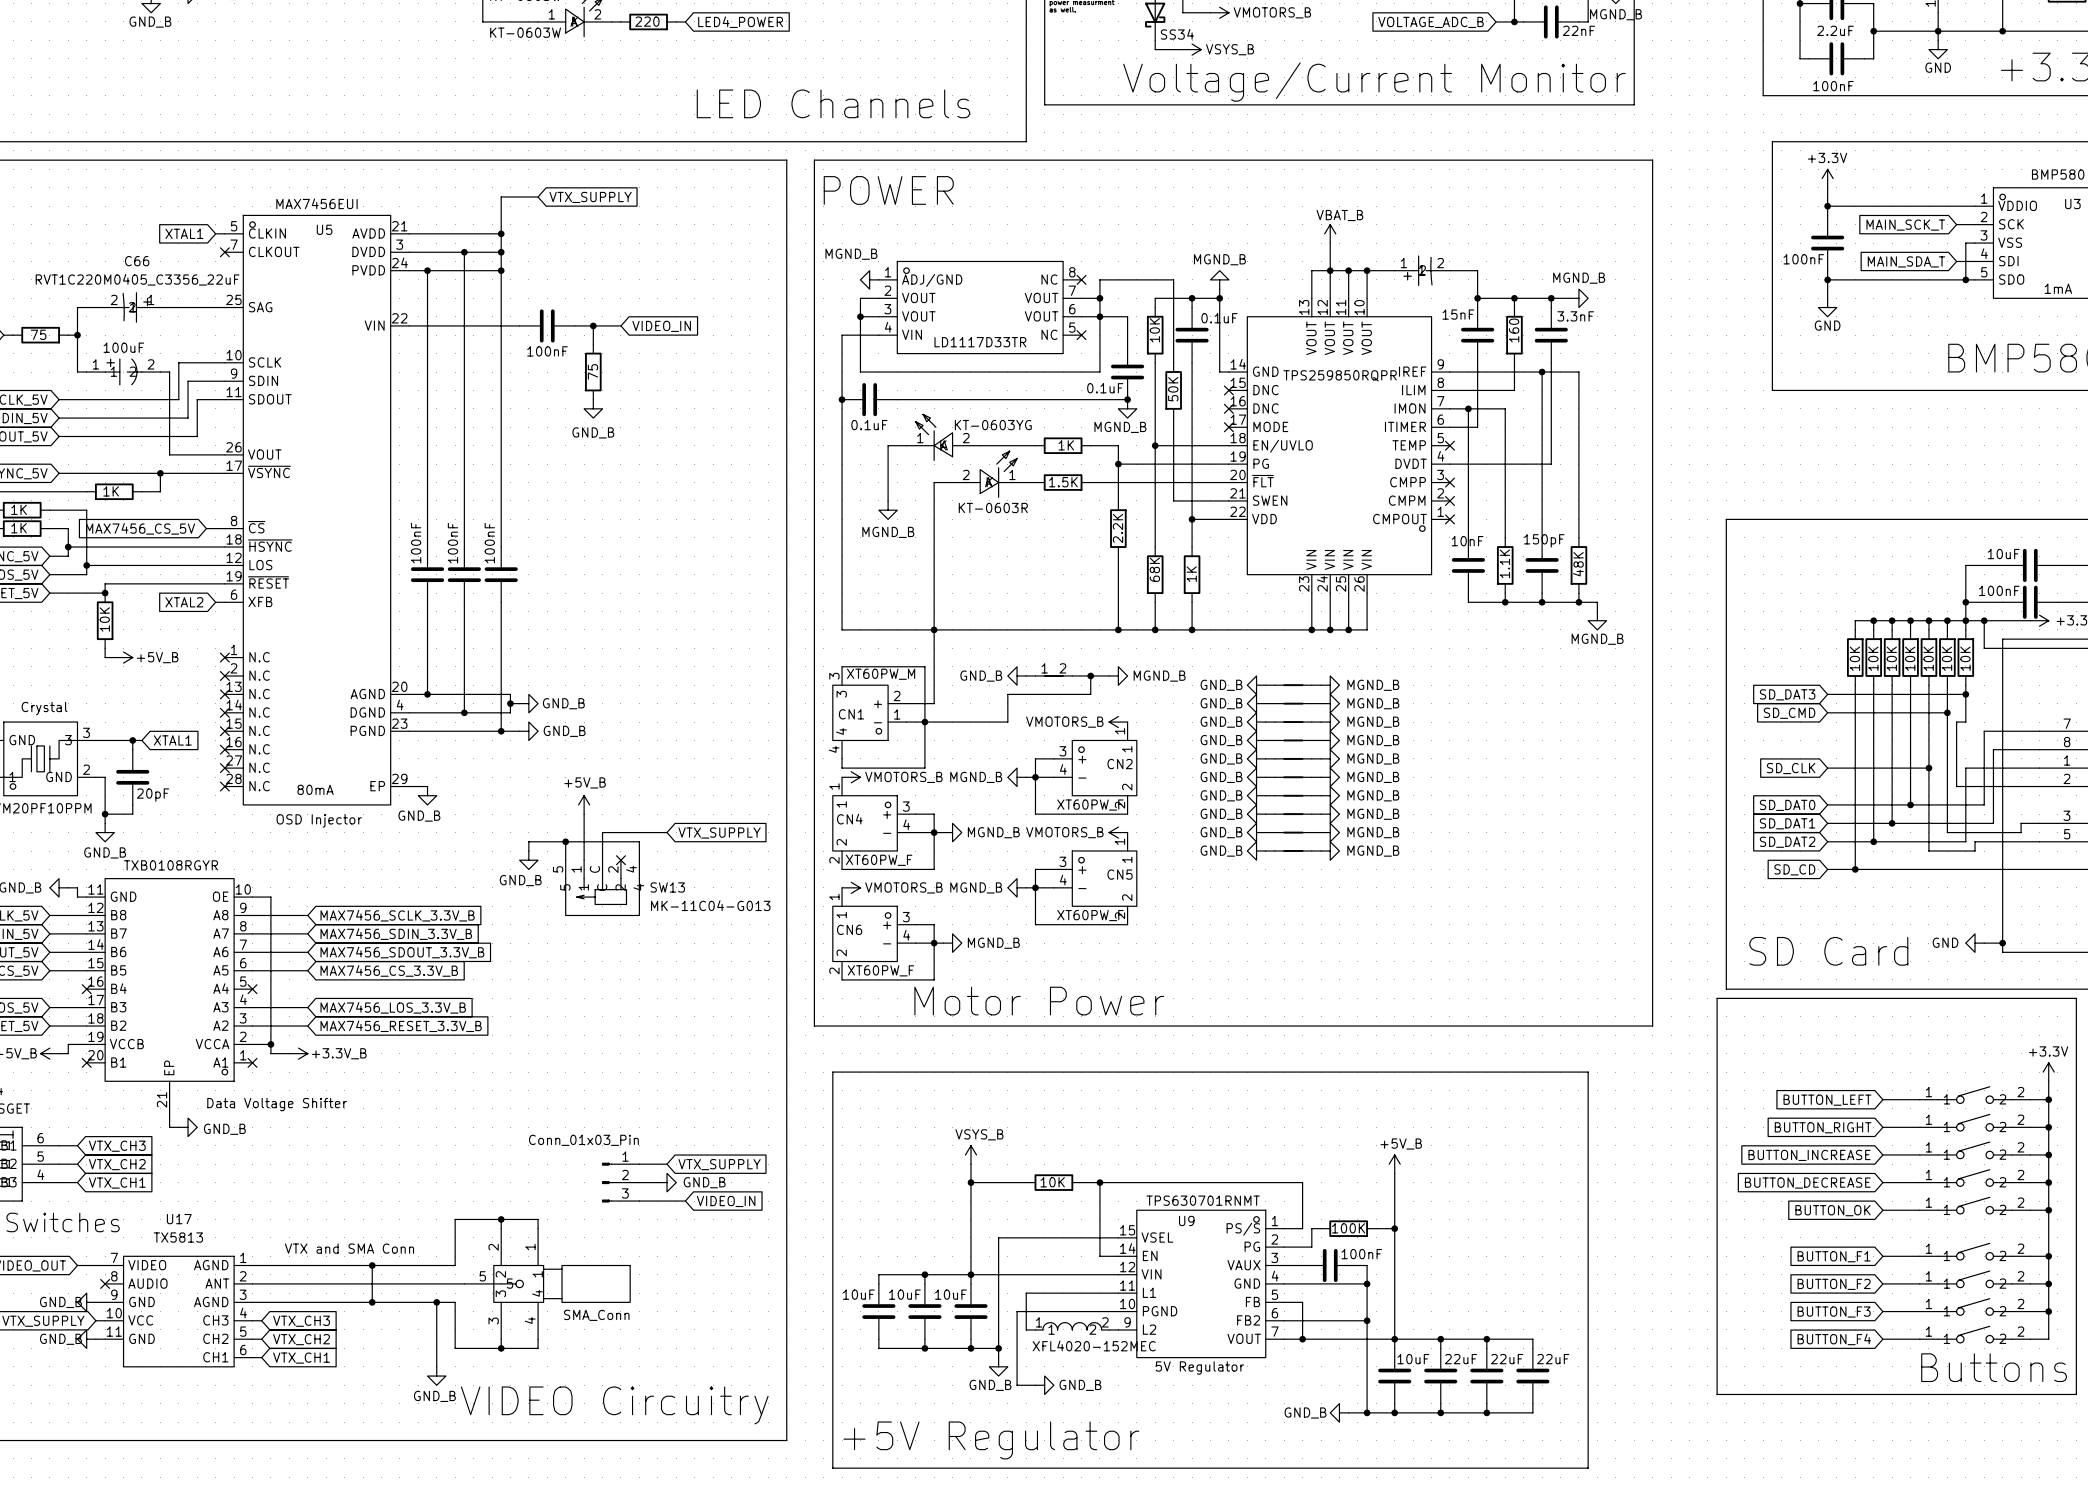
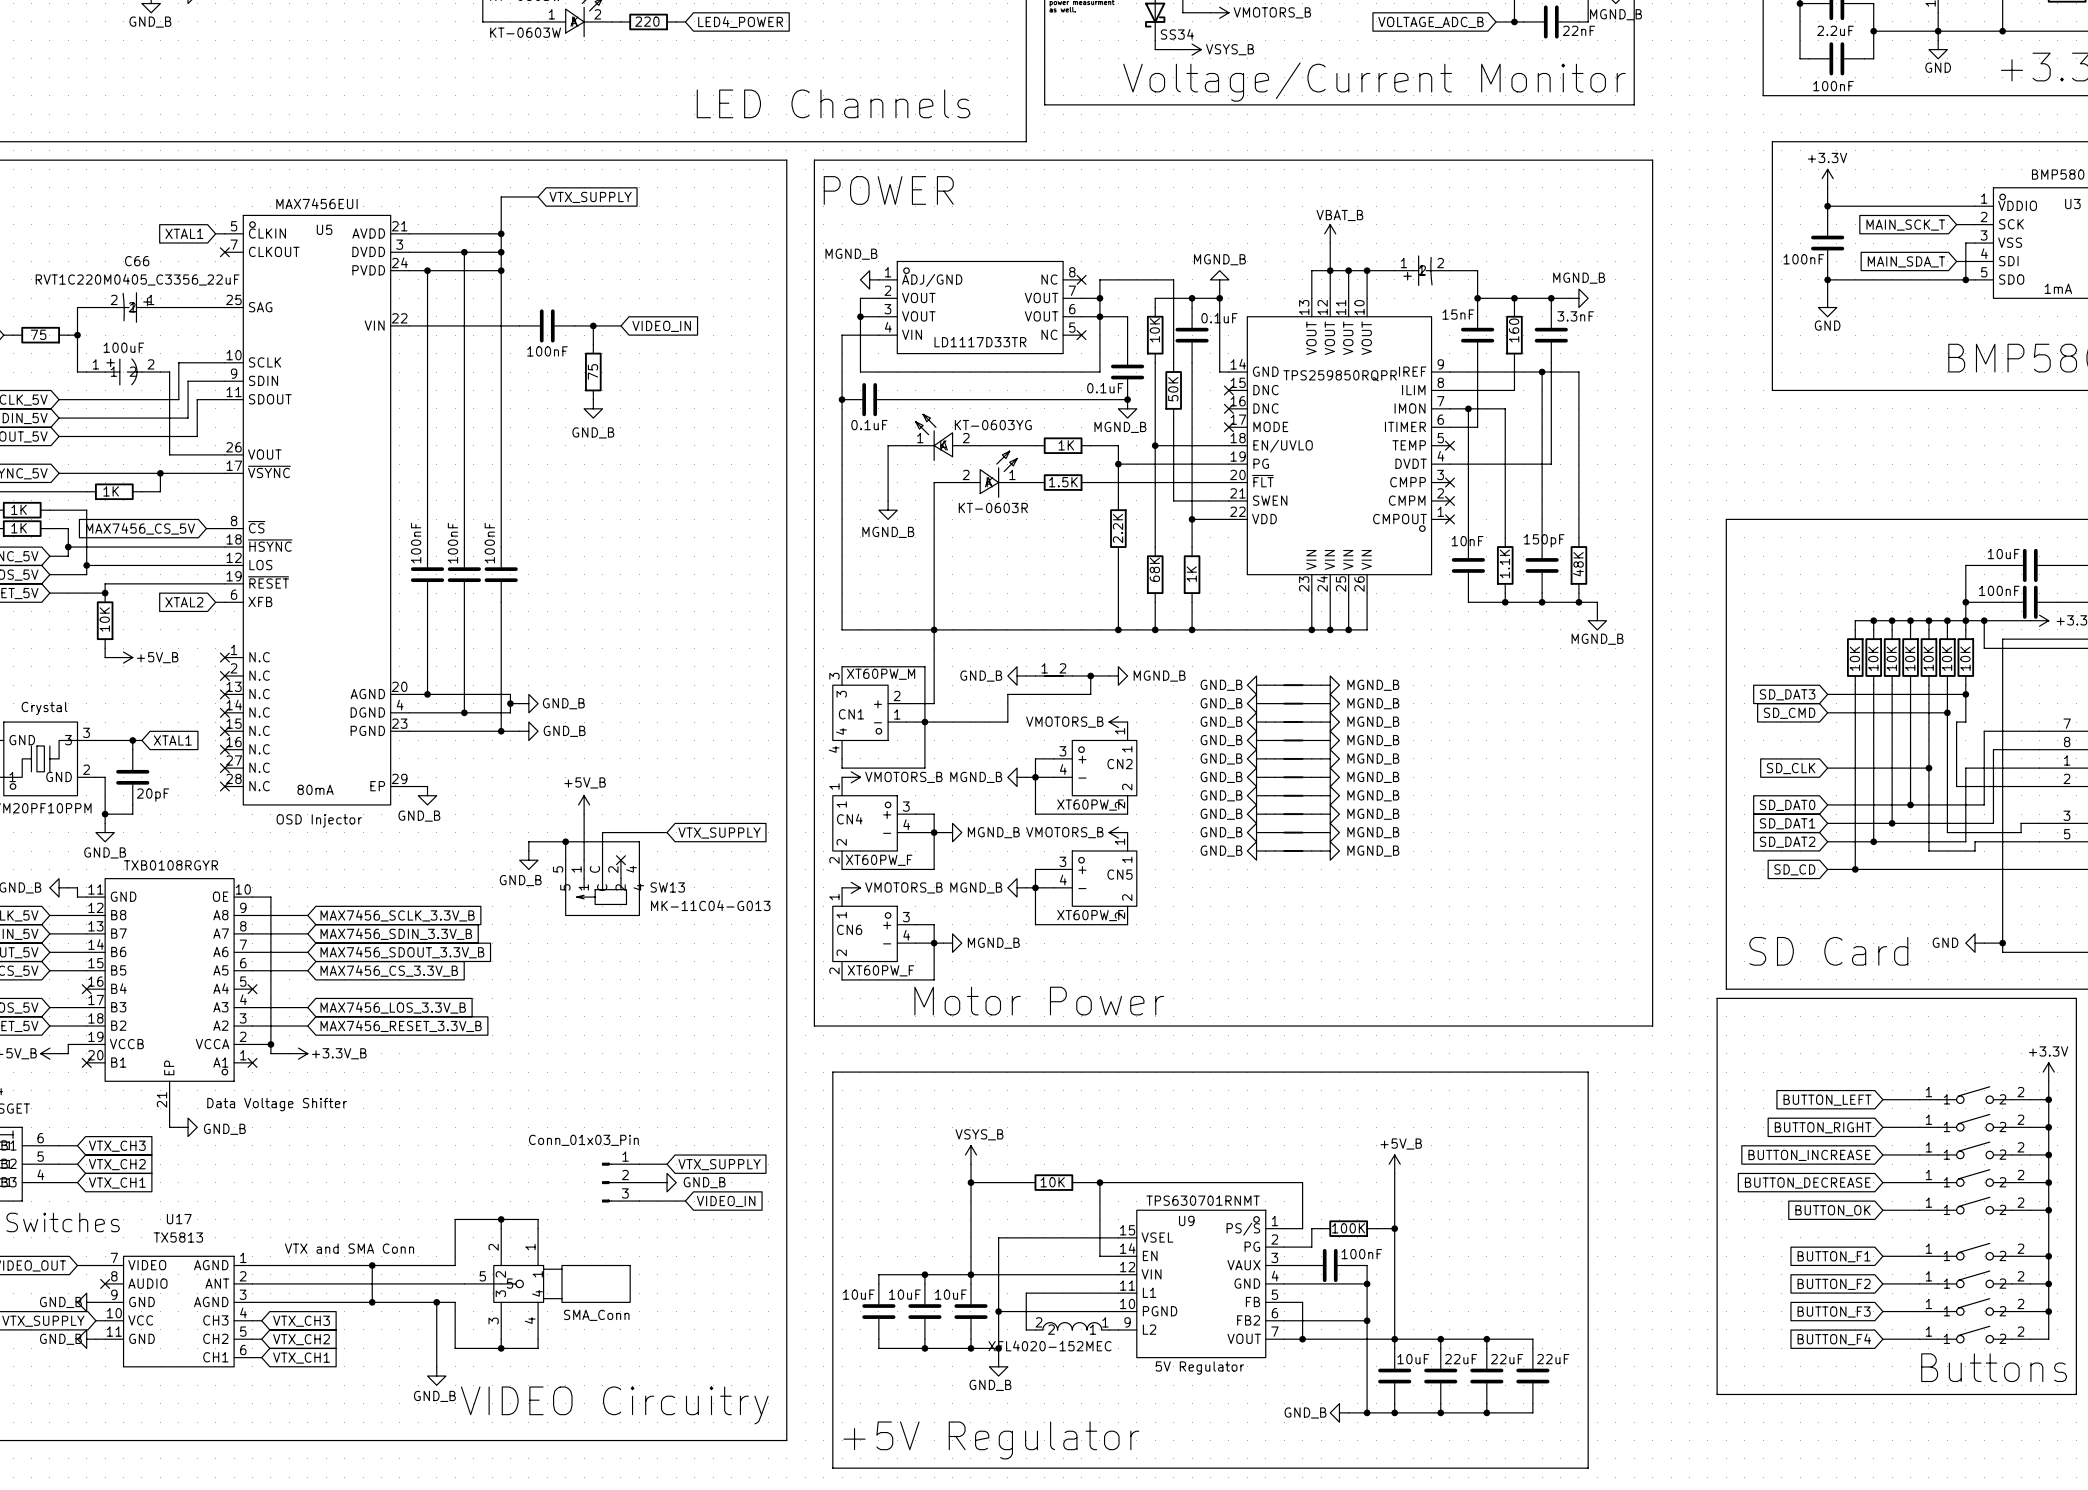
junction: none -> (998, 1311)
wire: (1017, 1311) (1017, 1385) (1035, 1385) -> (1017, 1311) (998, 1311)
part flip: as is (1072, 1326) -> left-right (1072, 1326)
power symbol: GND_B (1044, 1385) -> none

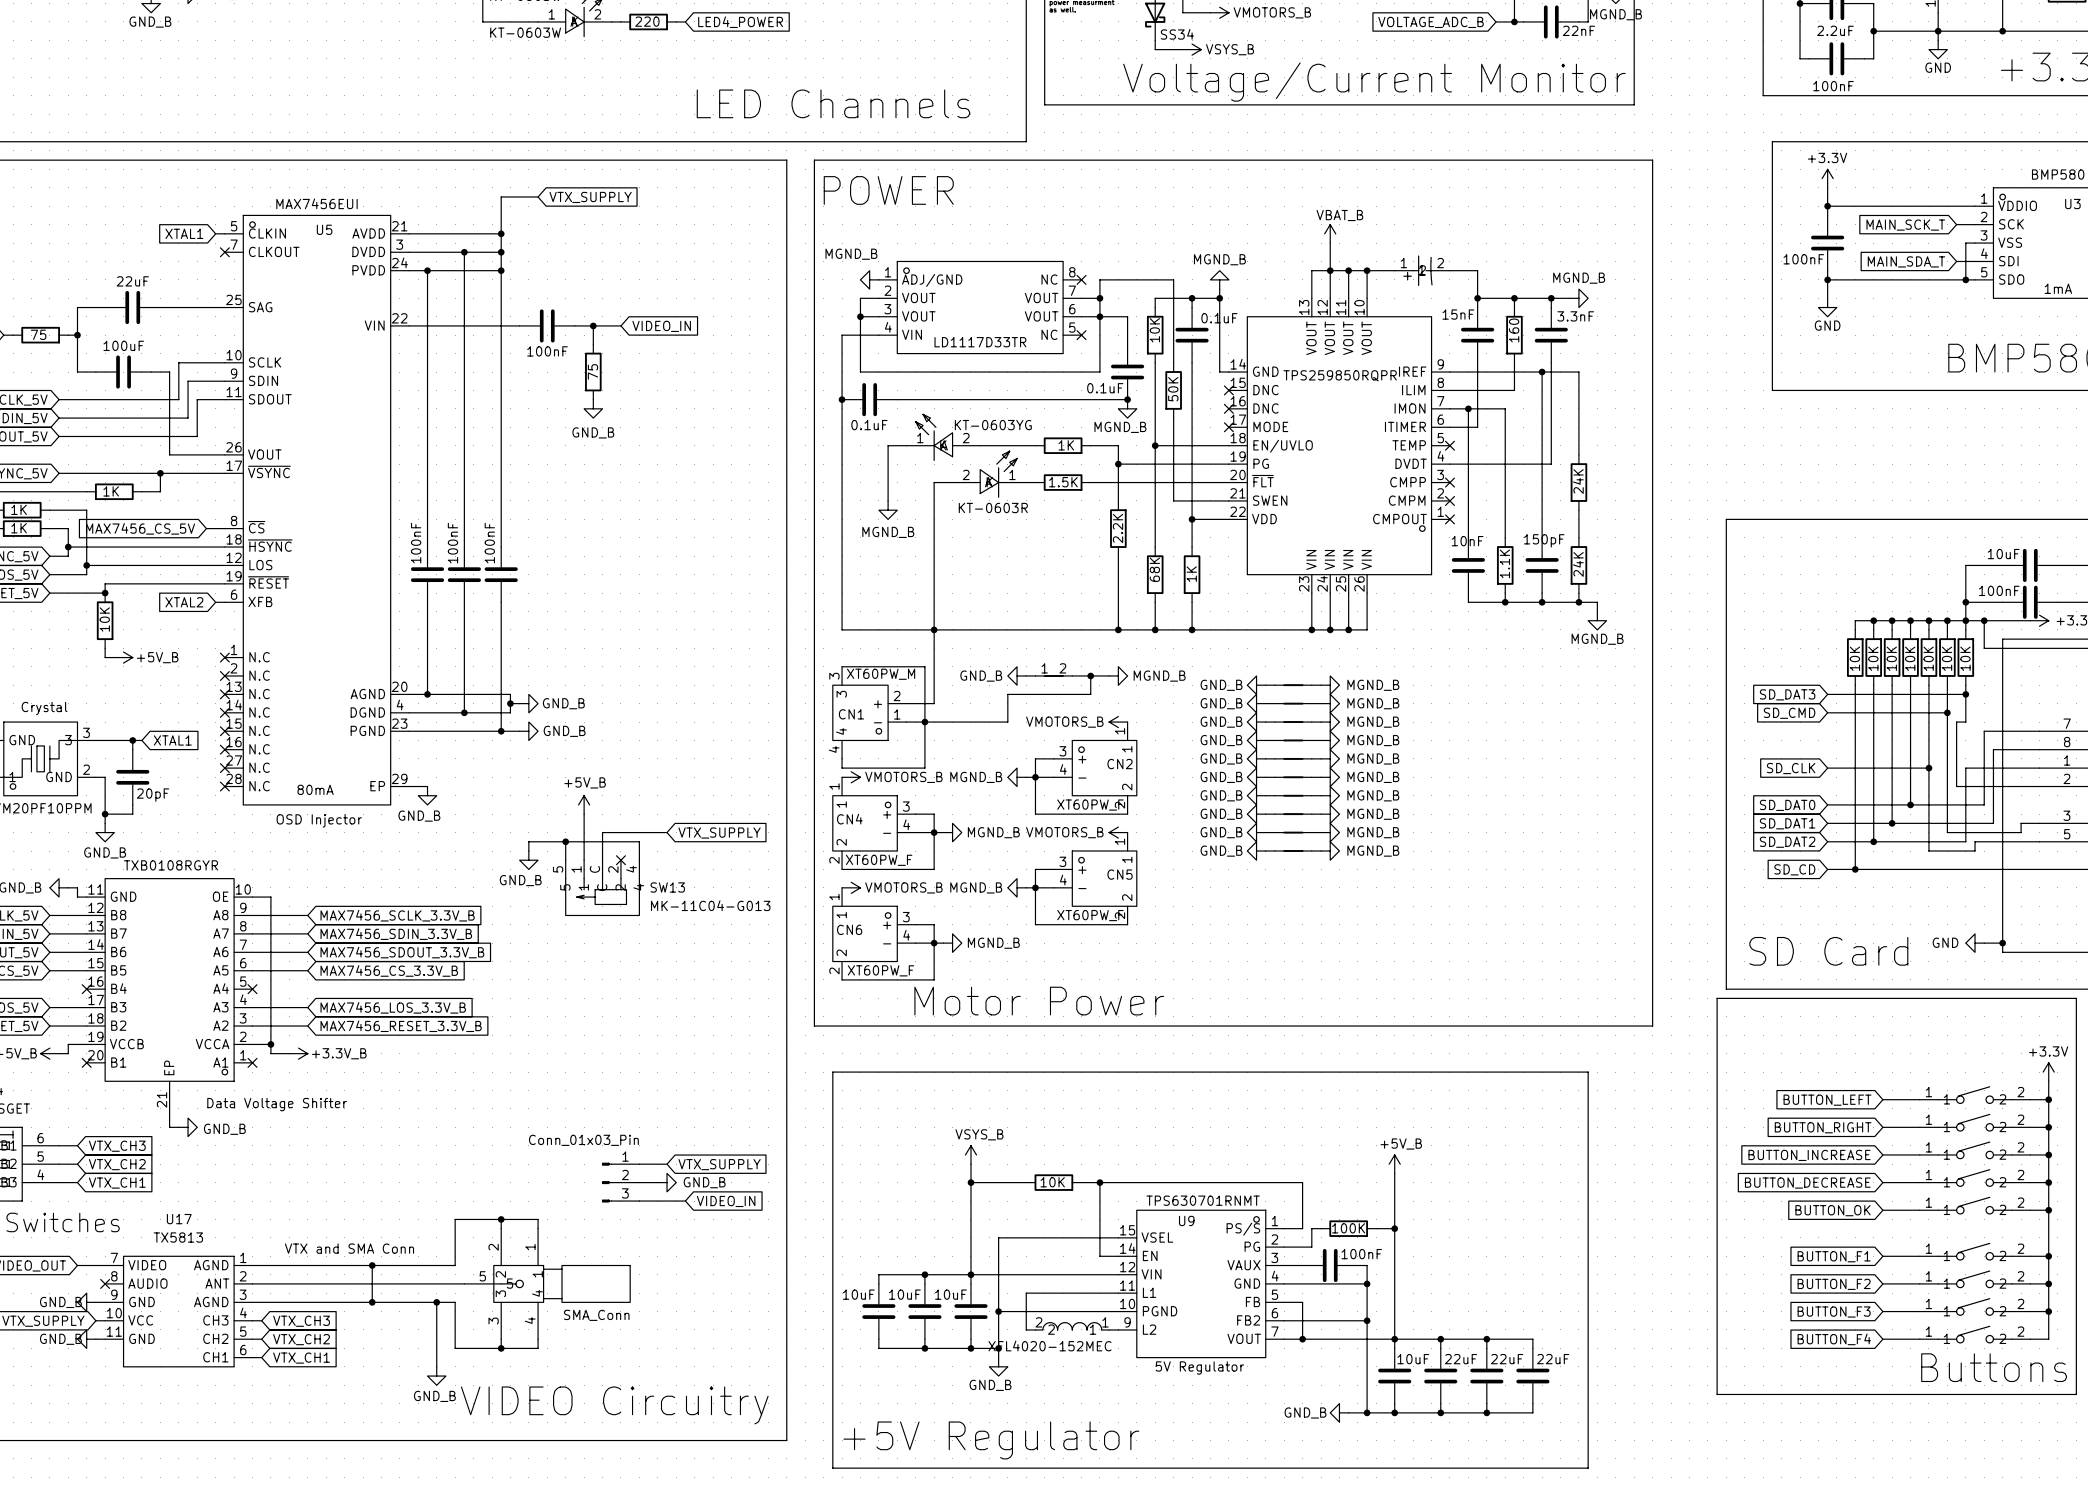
C66: RVT1C220M0405_C3356_22uF (132, 307) -> none
part: none -> 22uF (132, 307)
part symbol: [86, 359, 161, 385] -> [95, 355, 152, 389]
part: none -> 24K (1578, 482)
part value: 48K (1578, 564) -> 24K (1578, 564)

